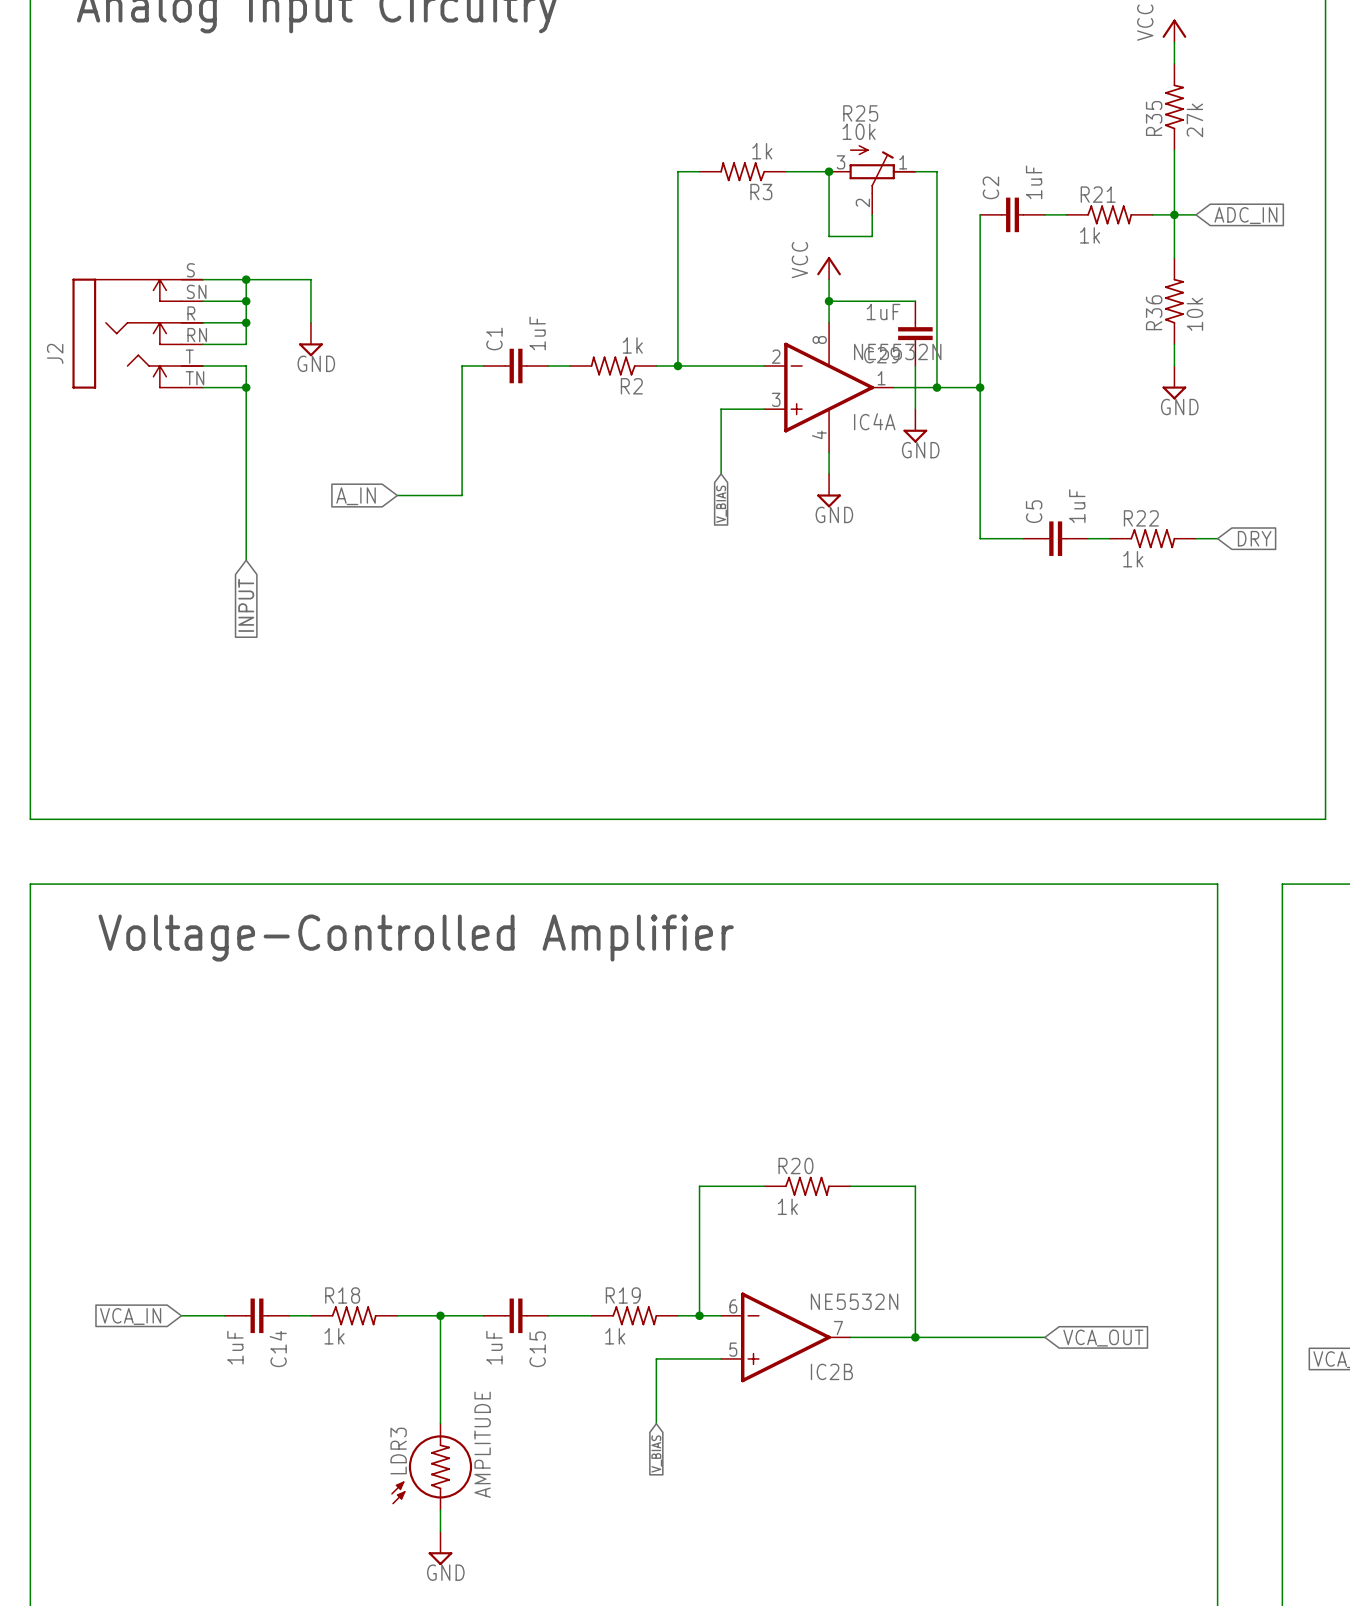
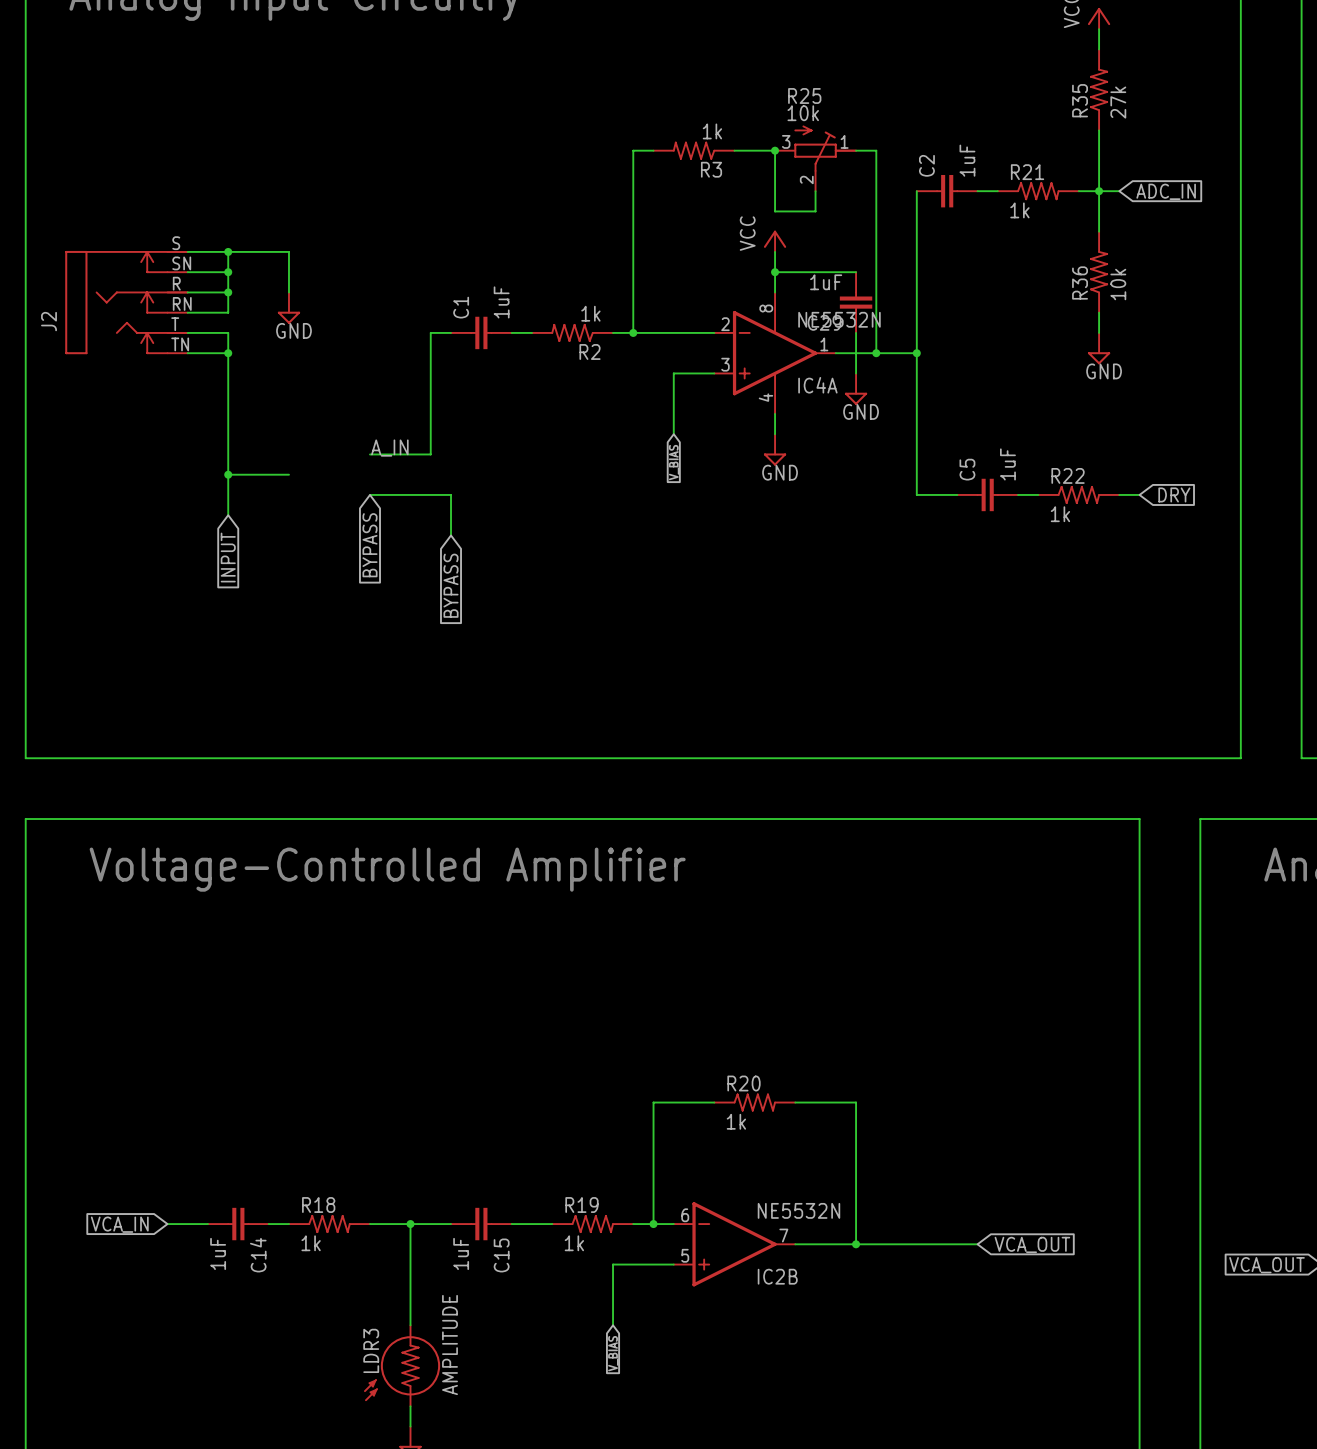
label: none -> A_IN (389, 448)
global label: A_IN (356, 496) -> none
wire: none -> (228, 474) (288, 474)
junction: none -> (228, 474)
wire: none -> (370, 494) (451, 494) (451, 535)
global label: none -> BYPASS (370, 545)
global label: none -> BYPASS (451, 585)

